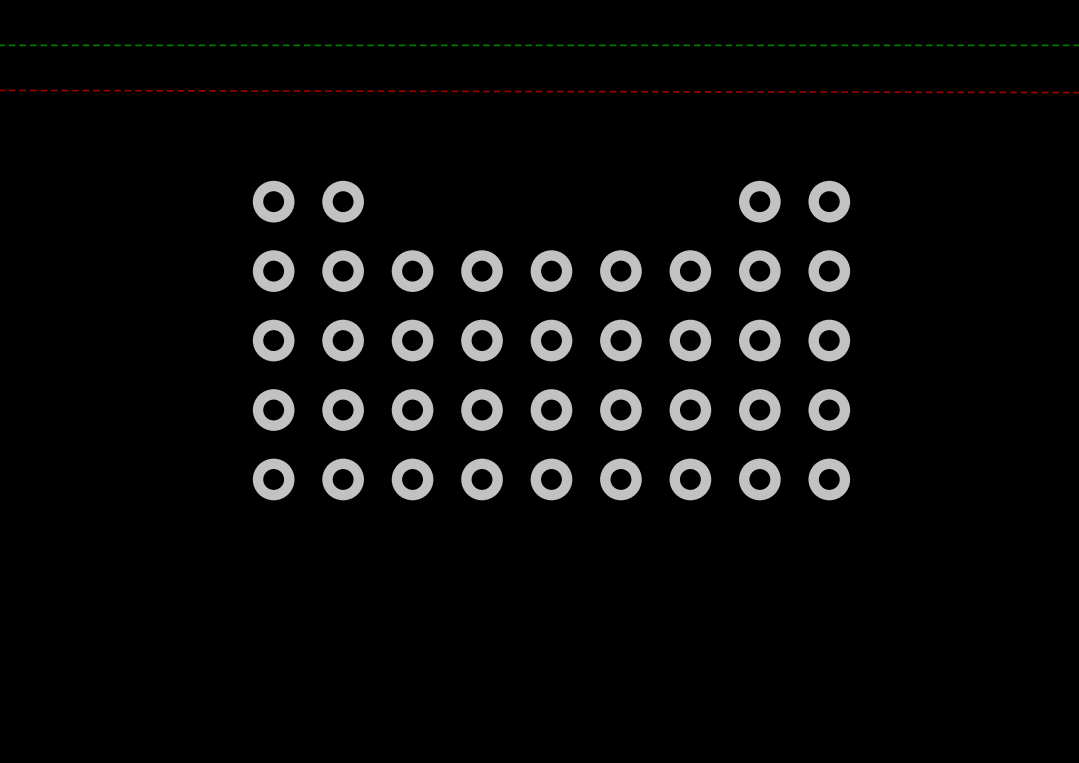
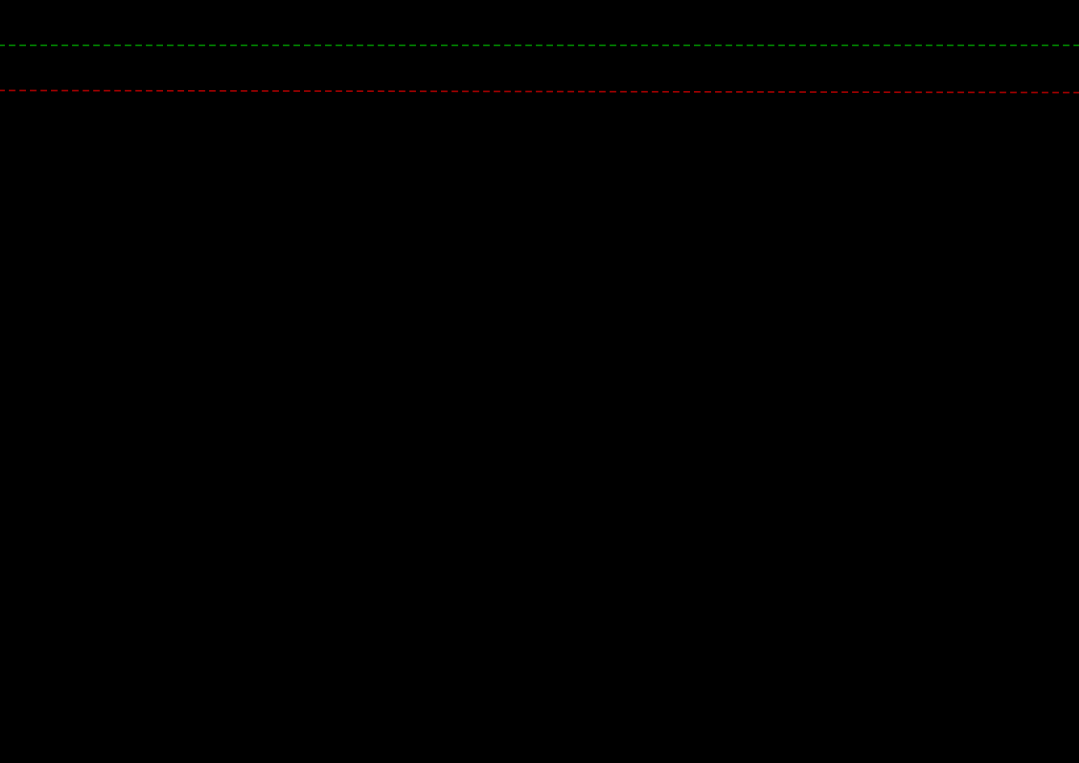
via: (273, 201) -> none
via: (343, 201) -> none
via: (759, 201) -> none
via: (829, 201) -> none
via: (273, 271) -> none
via: (343, 271) -> none
via: (412, 271) -> none
via: (482, 271) -> none
via: (551, 271) -> none
via: (620, 271) -> none
via: (690, 271) -> none
via: (759, 271) -> none
via: (829, 271) -> none
via: (273, 340) -> none
via: (343, 340) -> none
via: (412, 340) -> none
via: (482, 340) -> none
via: (551, 340) -> none
via: (620, 340) -> none
via: (690, 340) -> none
via: (759, 340) -> none
via: (829, 340) -> none
via: (273, 410) -> none
via: (343, 410) -> none
via: (412, 410) -> none
via: (482, 410) -> none
via: (551, 410) -> none
via: (620, 410) -> none
via: (690, 410) -> none
via: (759, 410) -> none
via: (829, 410) -> none
via: (273, 479) -> none
via: (343, 479) -> none
via: (412, 479) -> none
via: (482, 479) -> none
via: (551, 479) -> none
via: (620, 479) -> none
via: (690, 479) -> none
via: (759, 479) -> none
via: (829, 479) -> none

